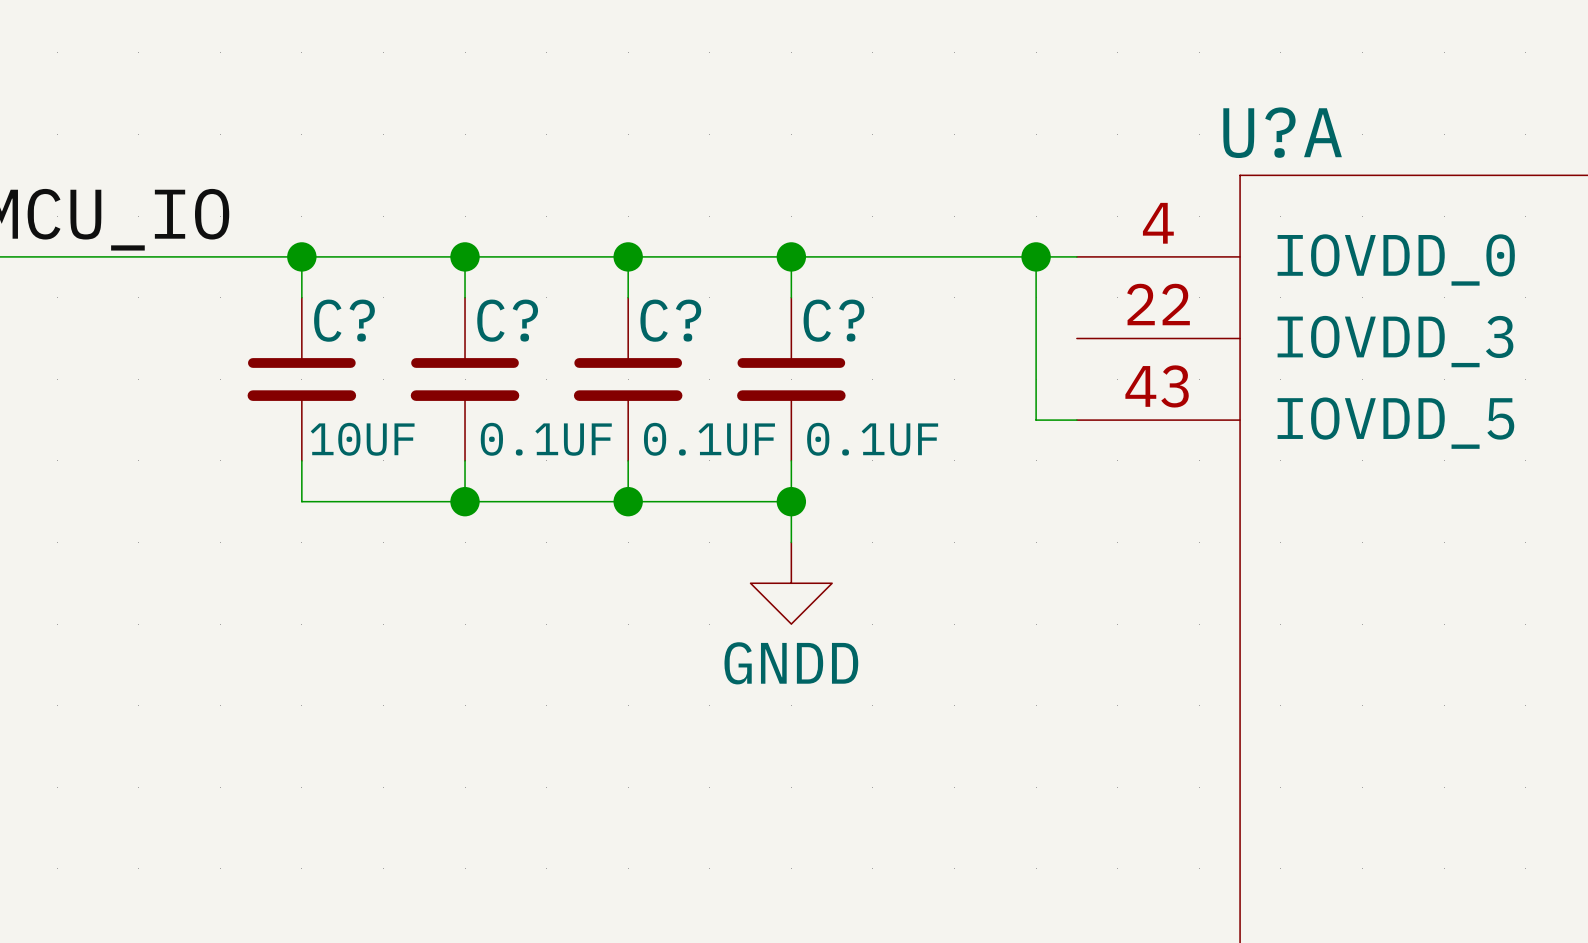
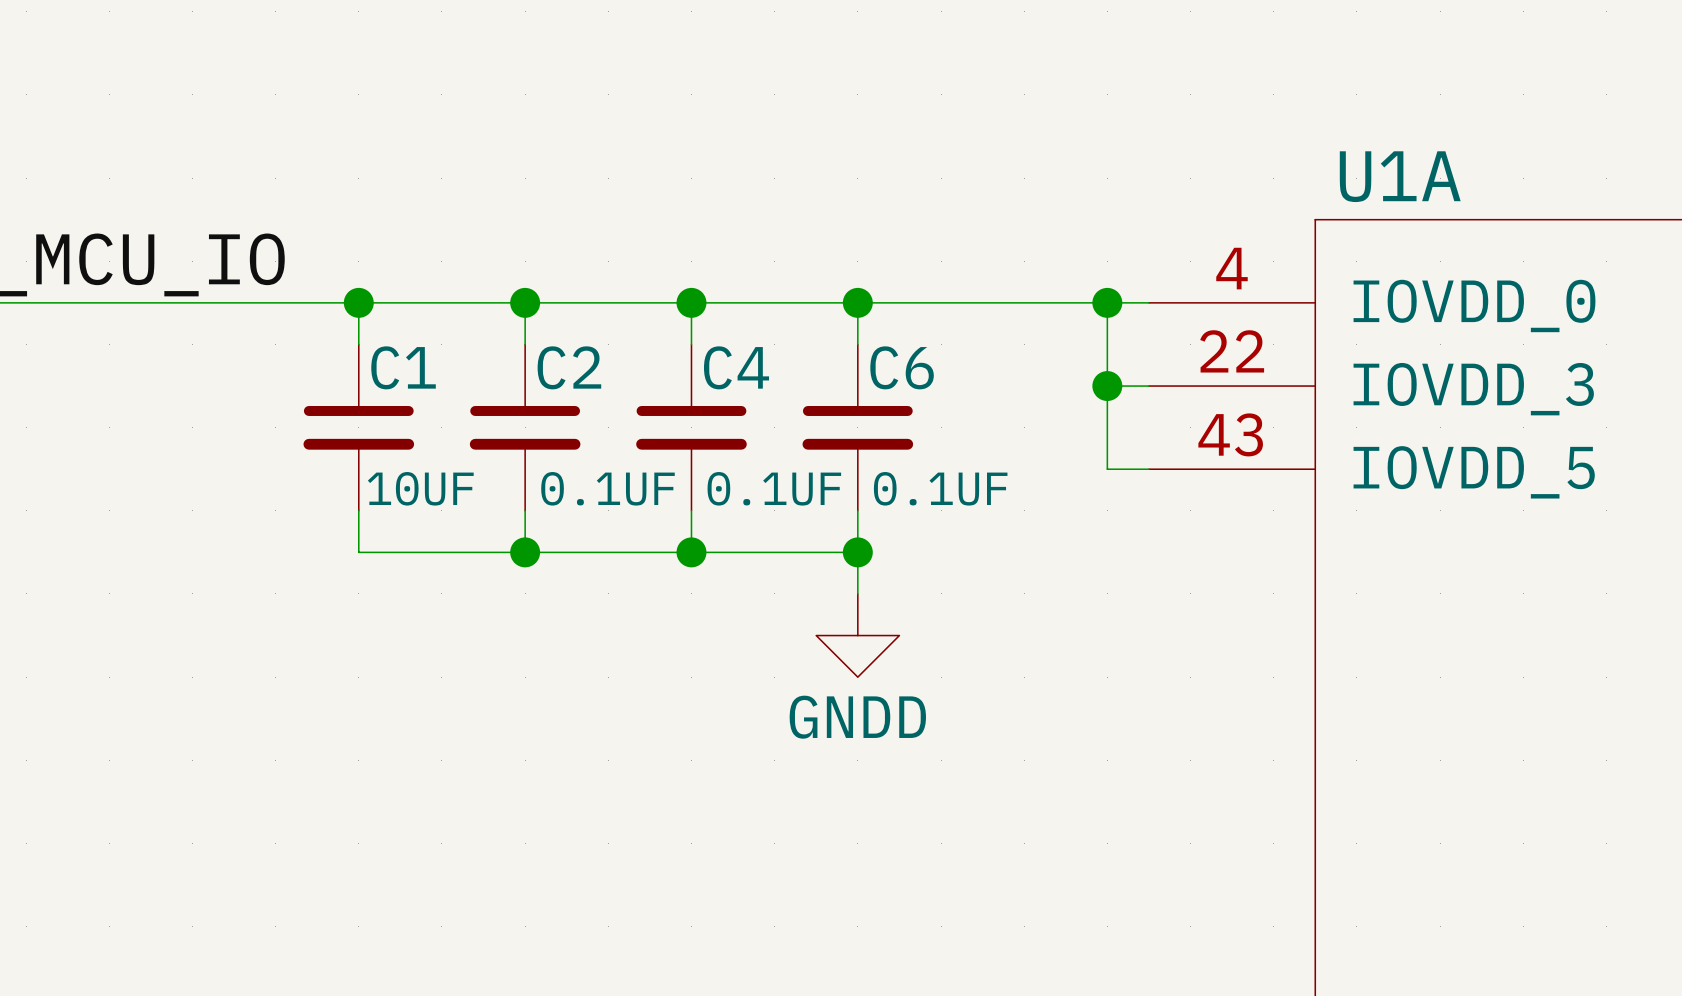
U?A name: U?A (1282, 132) -> U1A (1400, 176)
C? name: C? (344, 320) -> C1 (403, 367)
C? name: C? (507, 320) -> C2 (569, 367)
C? name: C? (670, 320) -> C4 (736, 367)
C? name: C? (833, 320) -> C6 (902, 367)
wire: none -> (1107, 386) (1148, 386)
junction: none -> (1107, 386)

